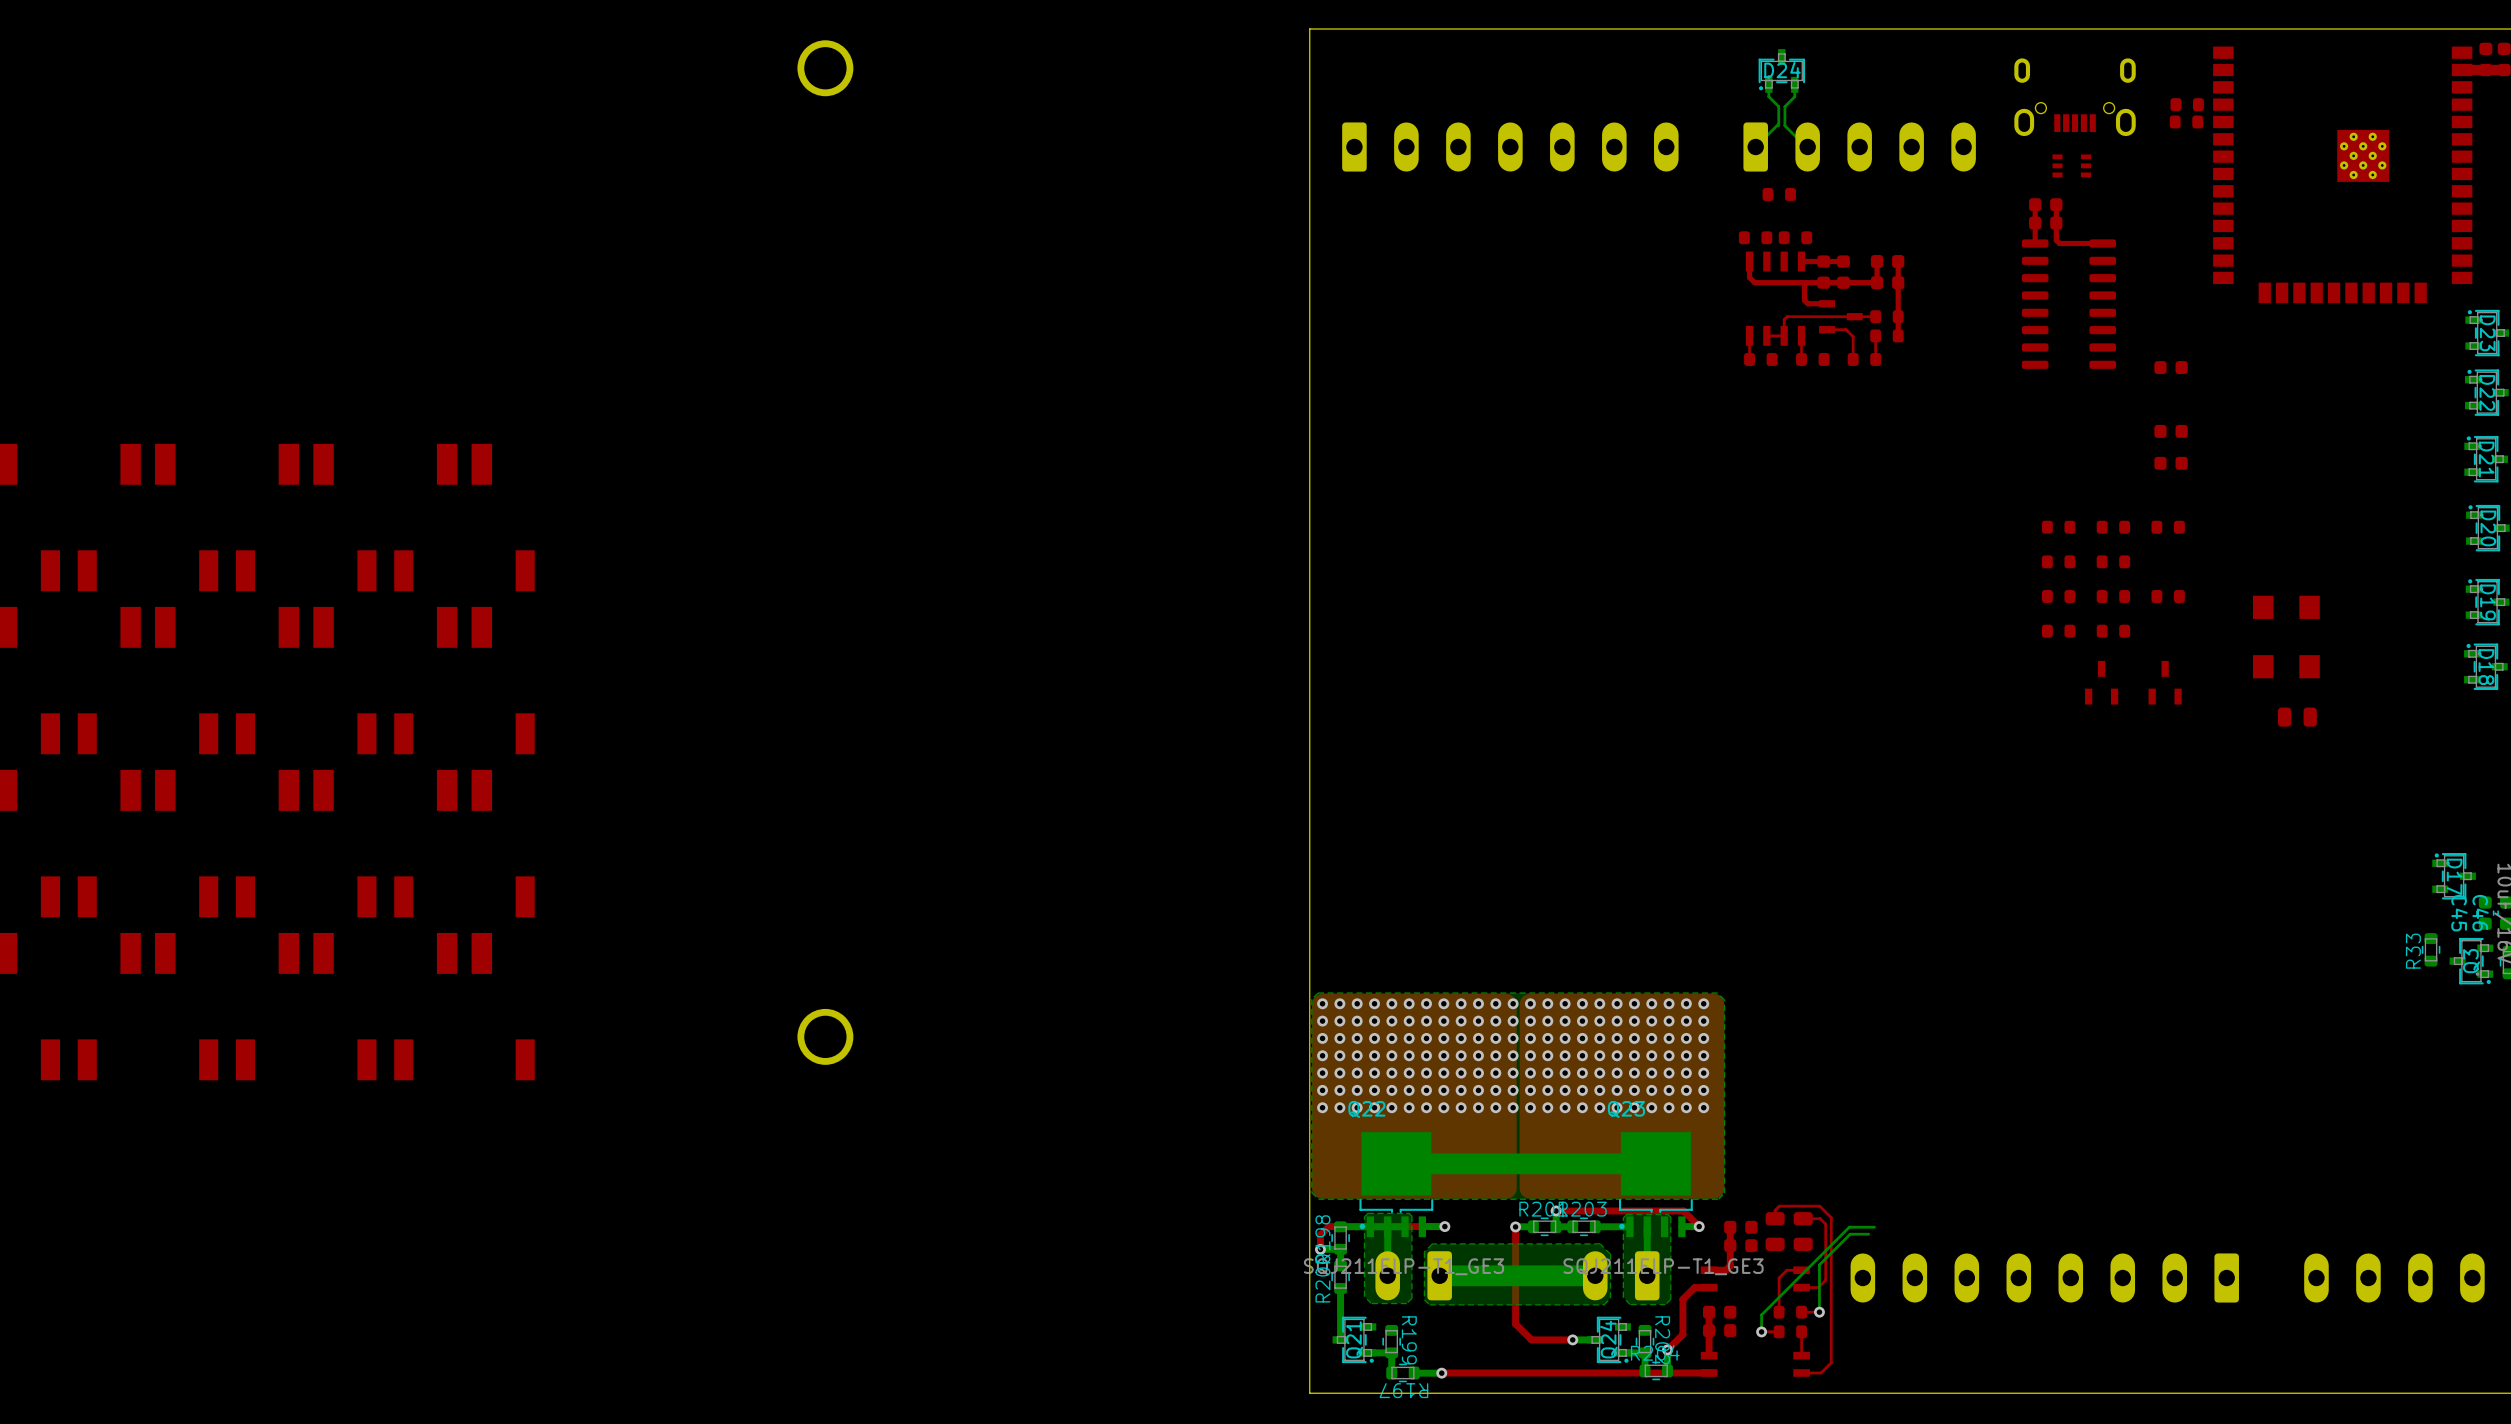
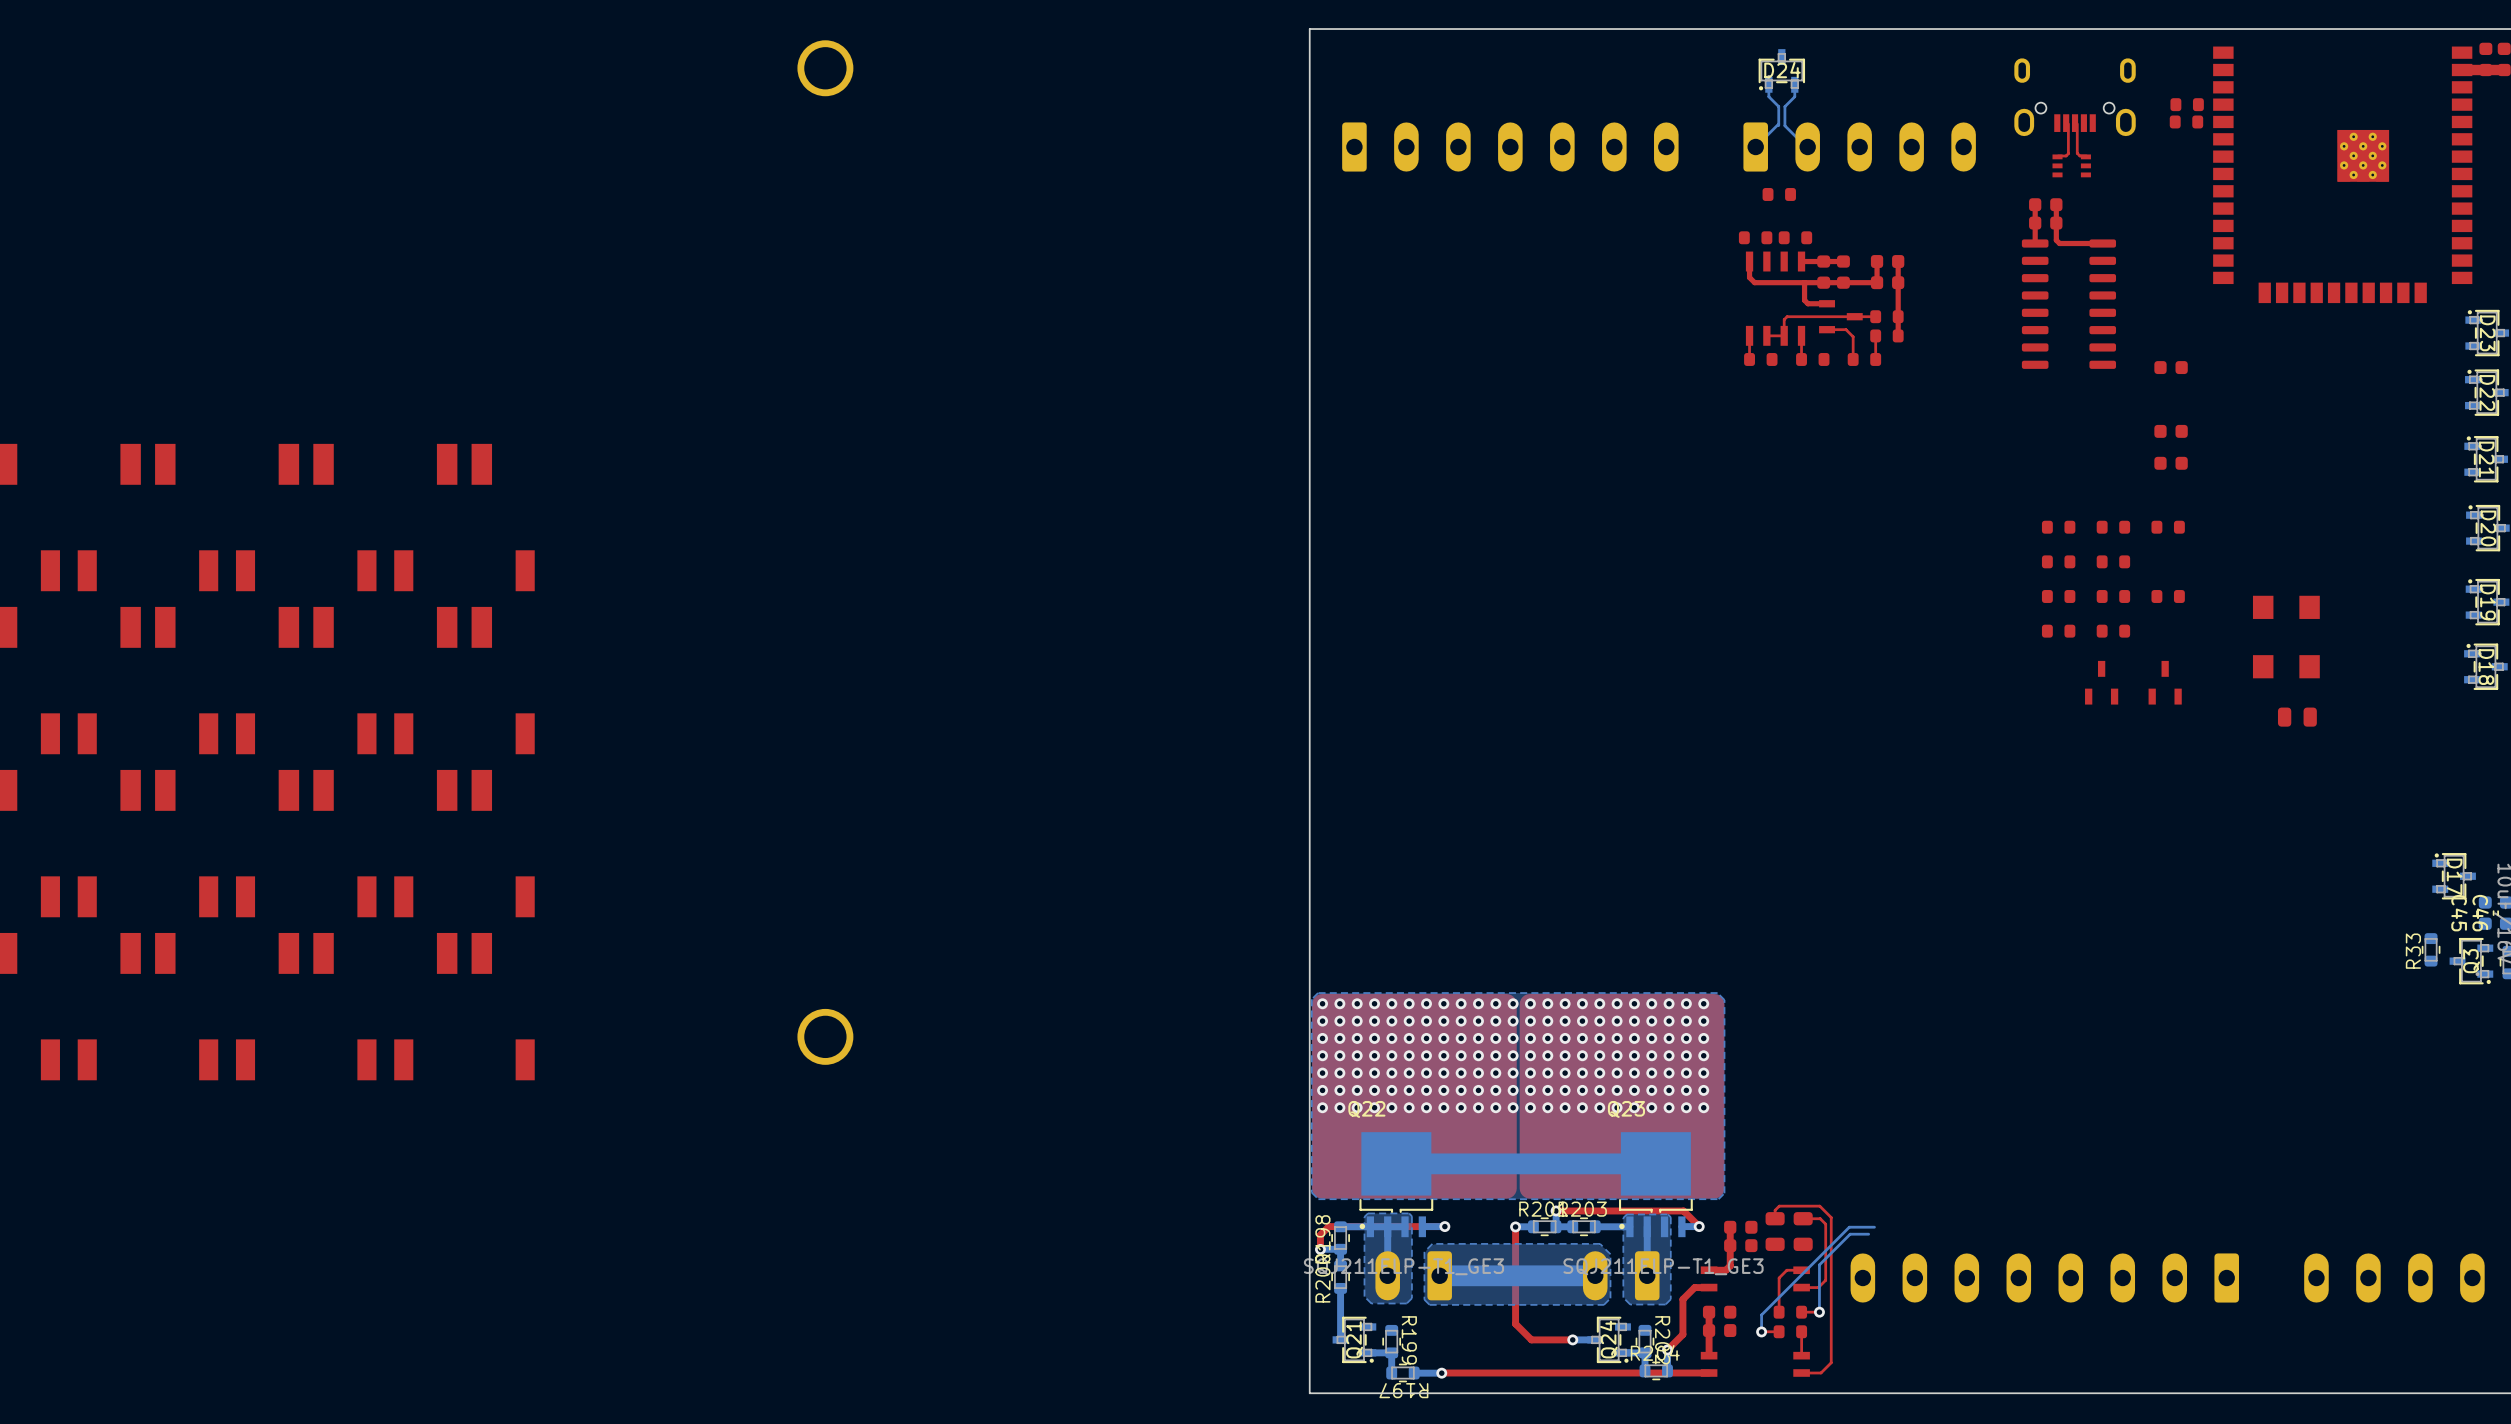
top track: none -> (2068, 123) (2068, 153) (2066, 156) (2058, 156)
top track: none -> (2077, 123) (2077, 153) (2079, 156) (2086, 156)

